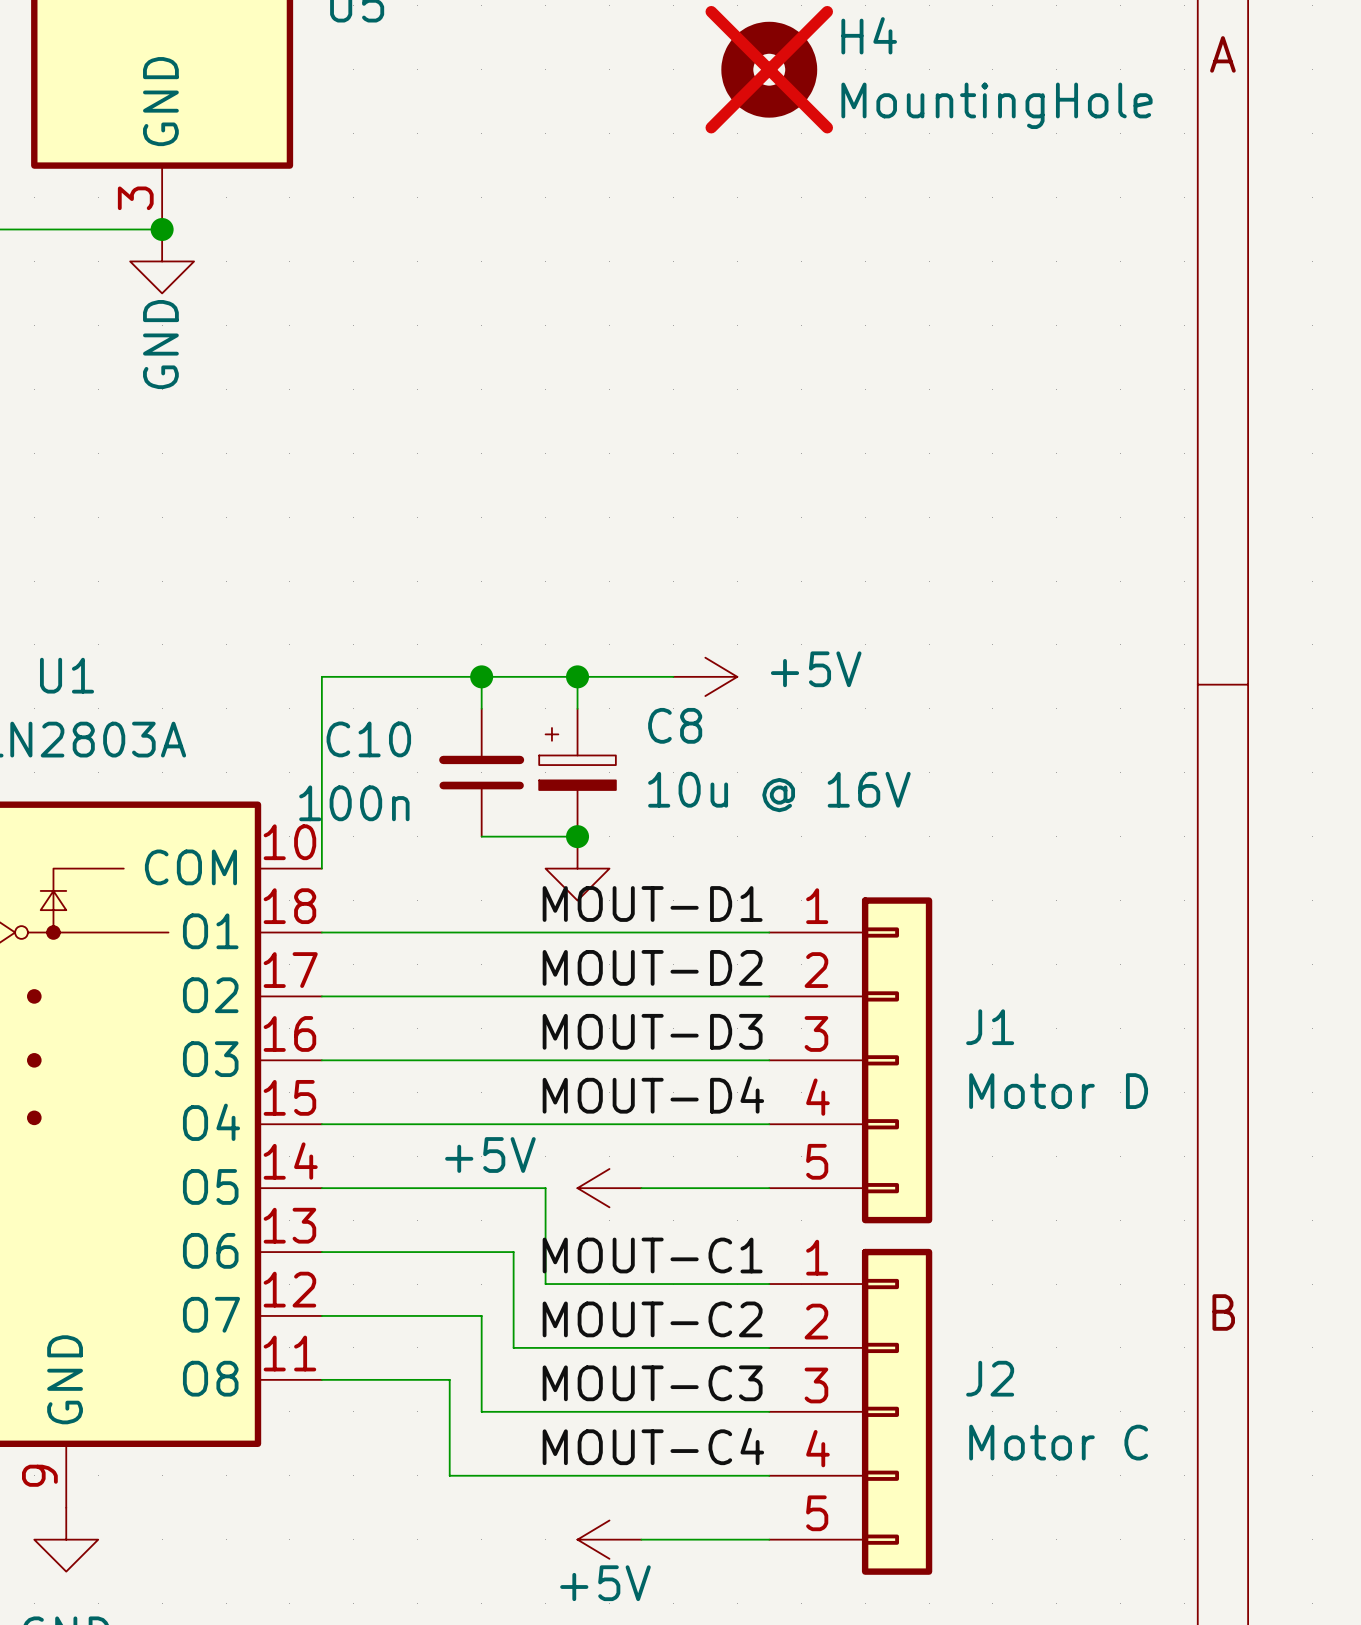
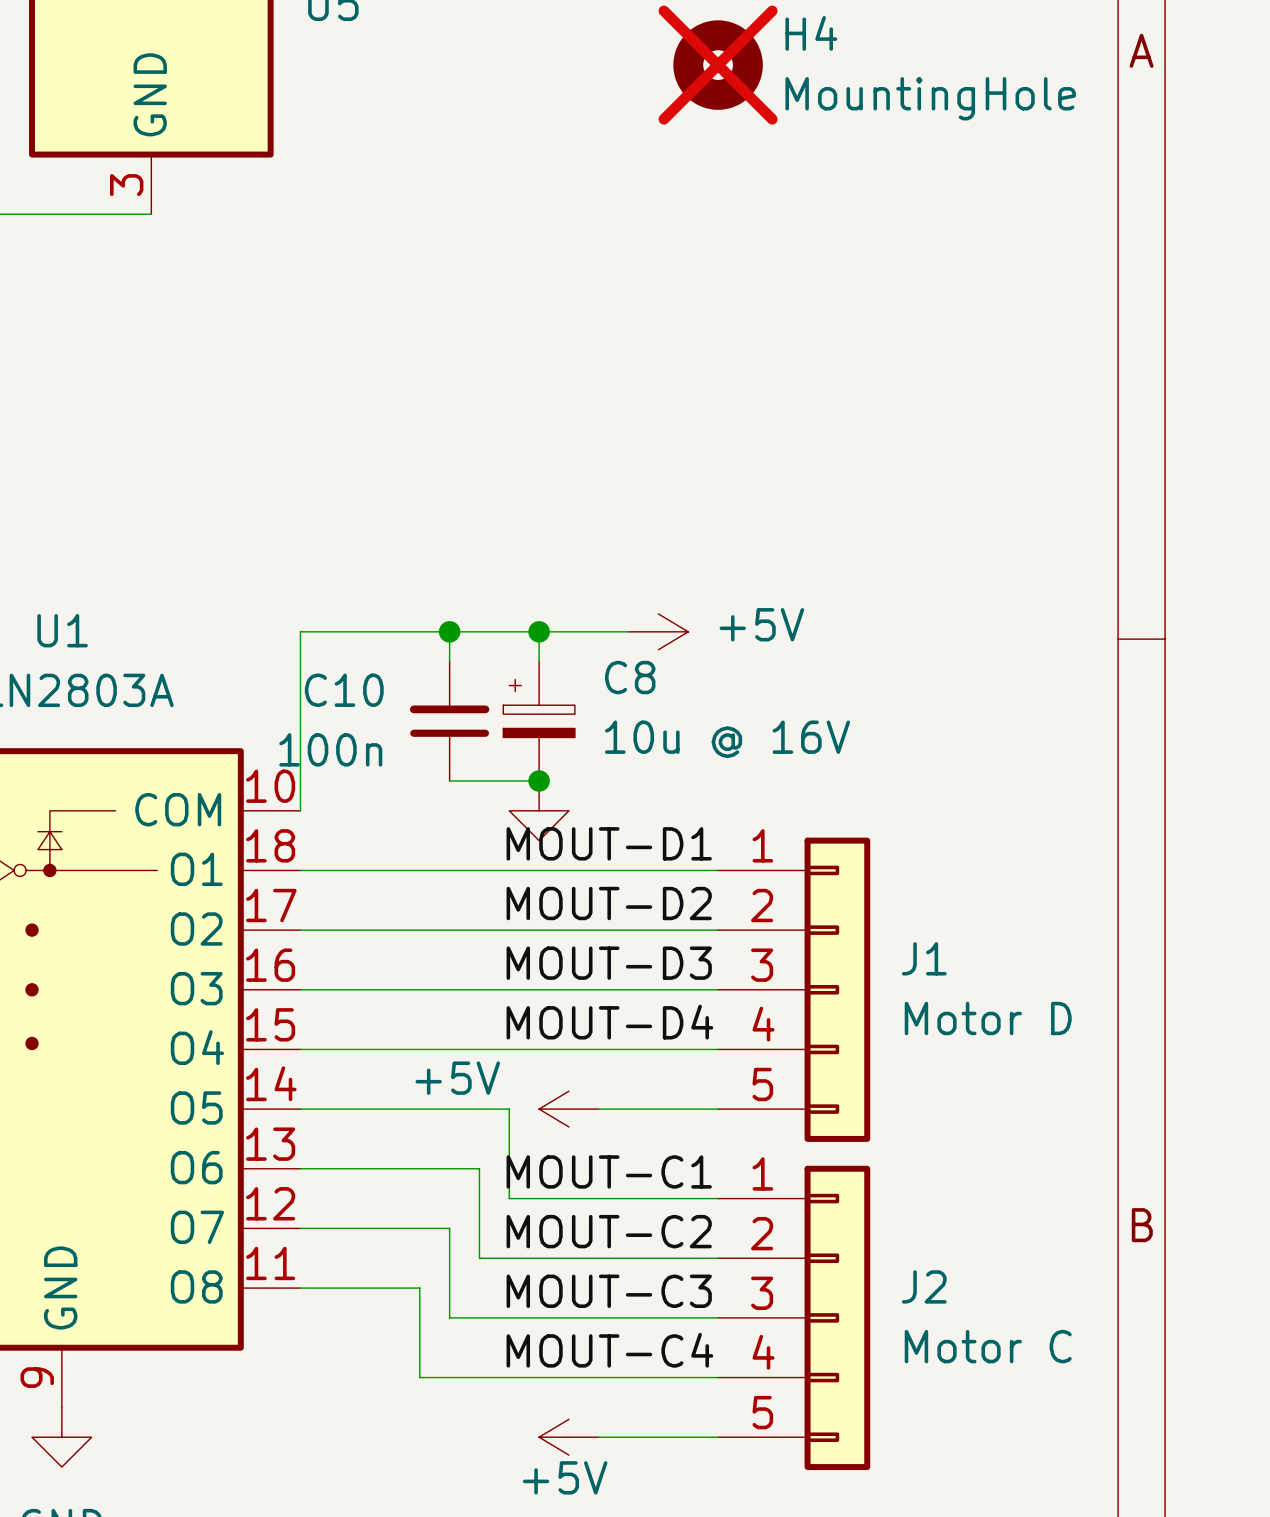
junction: (162, 229) -> none
power symbol: GND (162, 261) -> none

